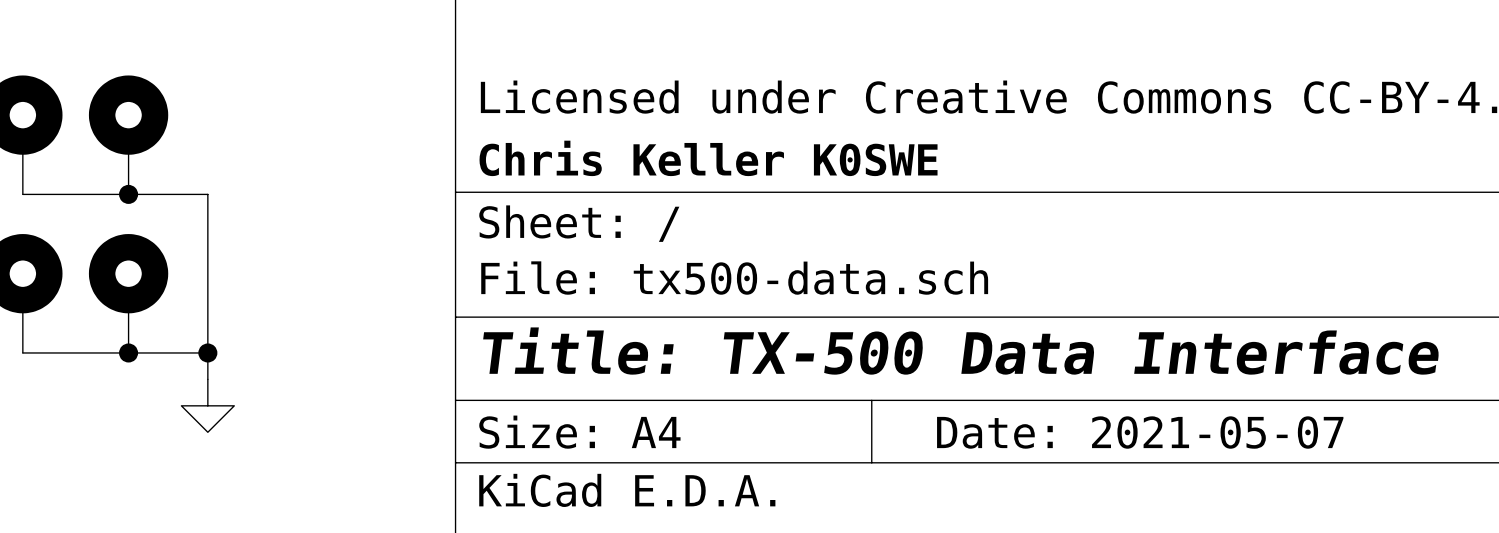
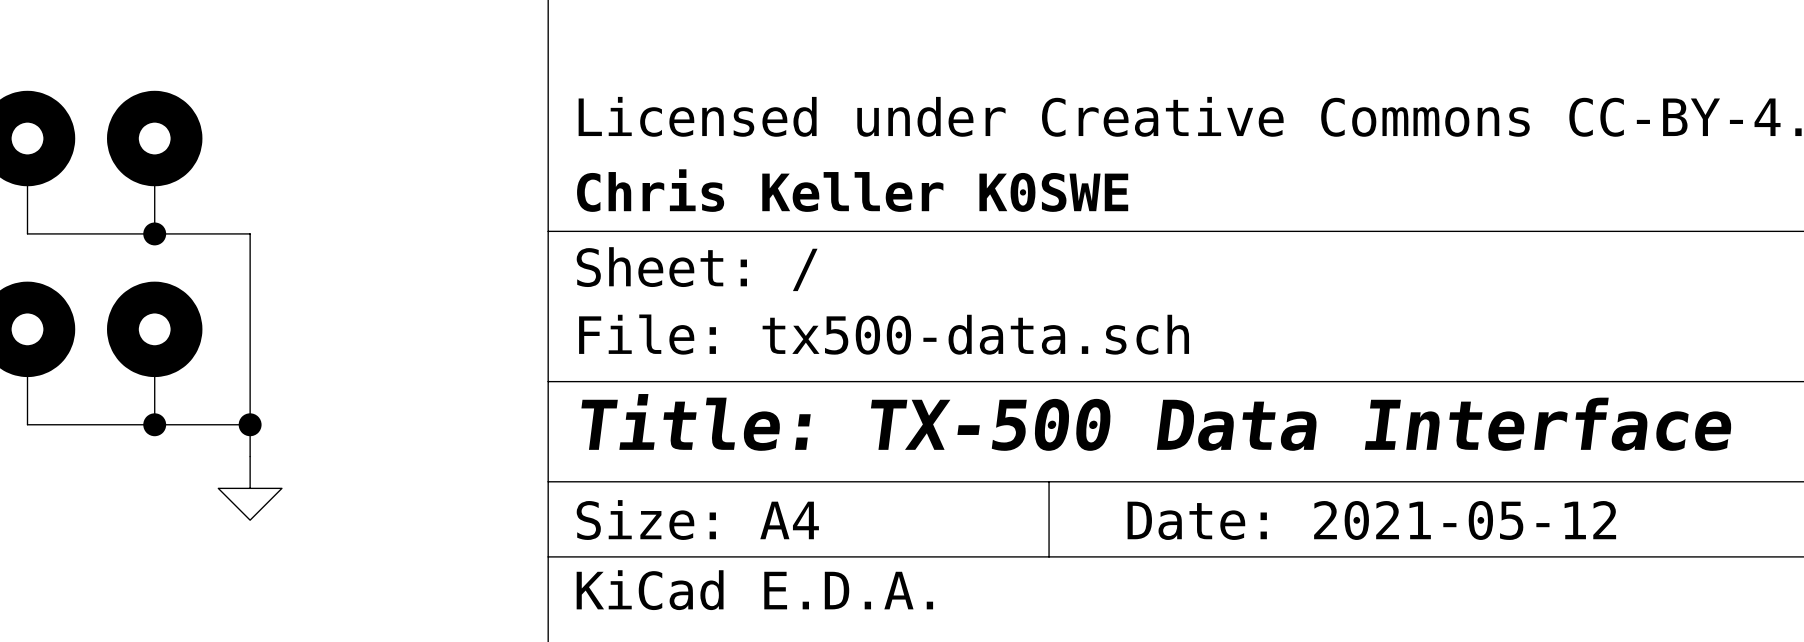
title block: Date: 2021-05-07 (1140, 432) -> Date: 2021-05-12 (1371, 520)

